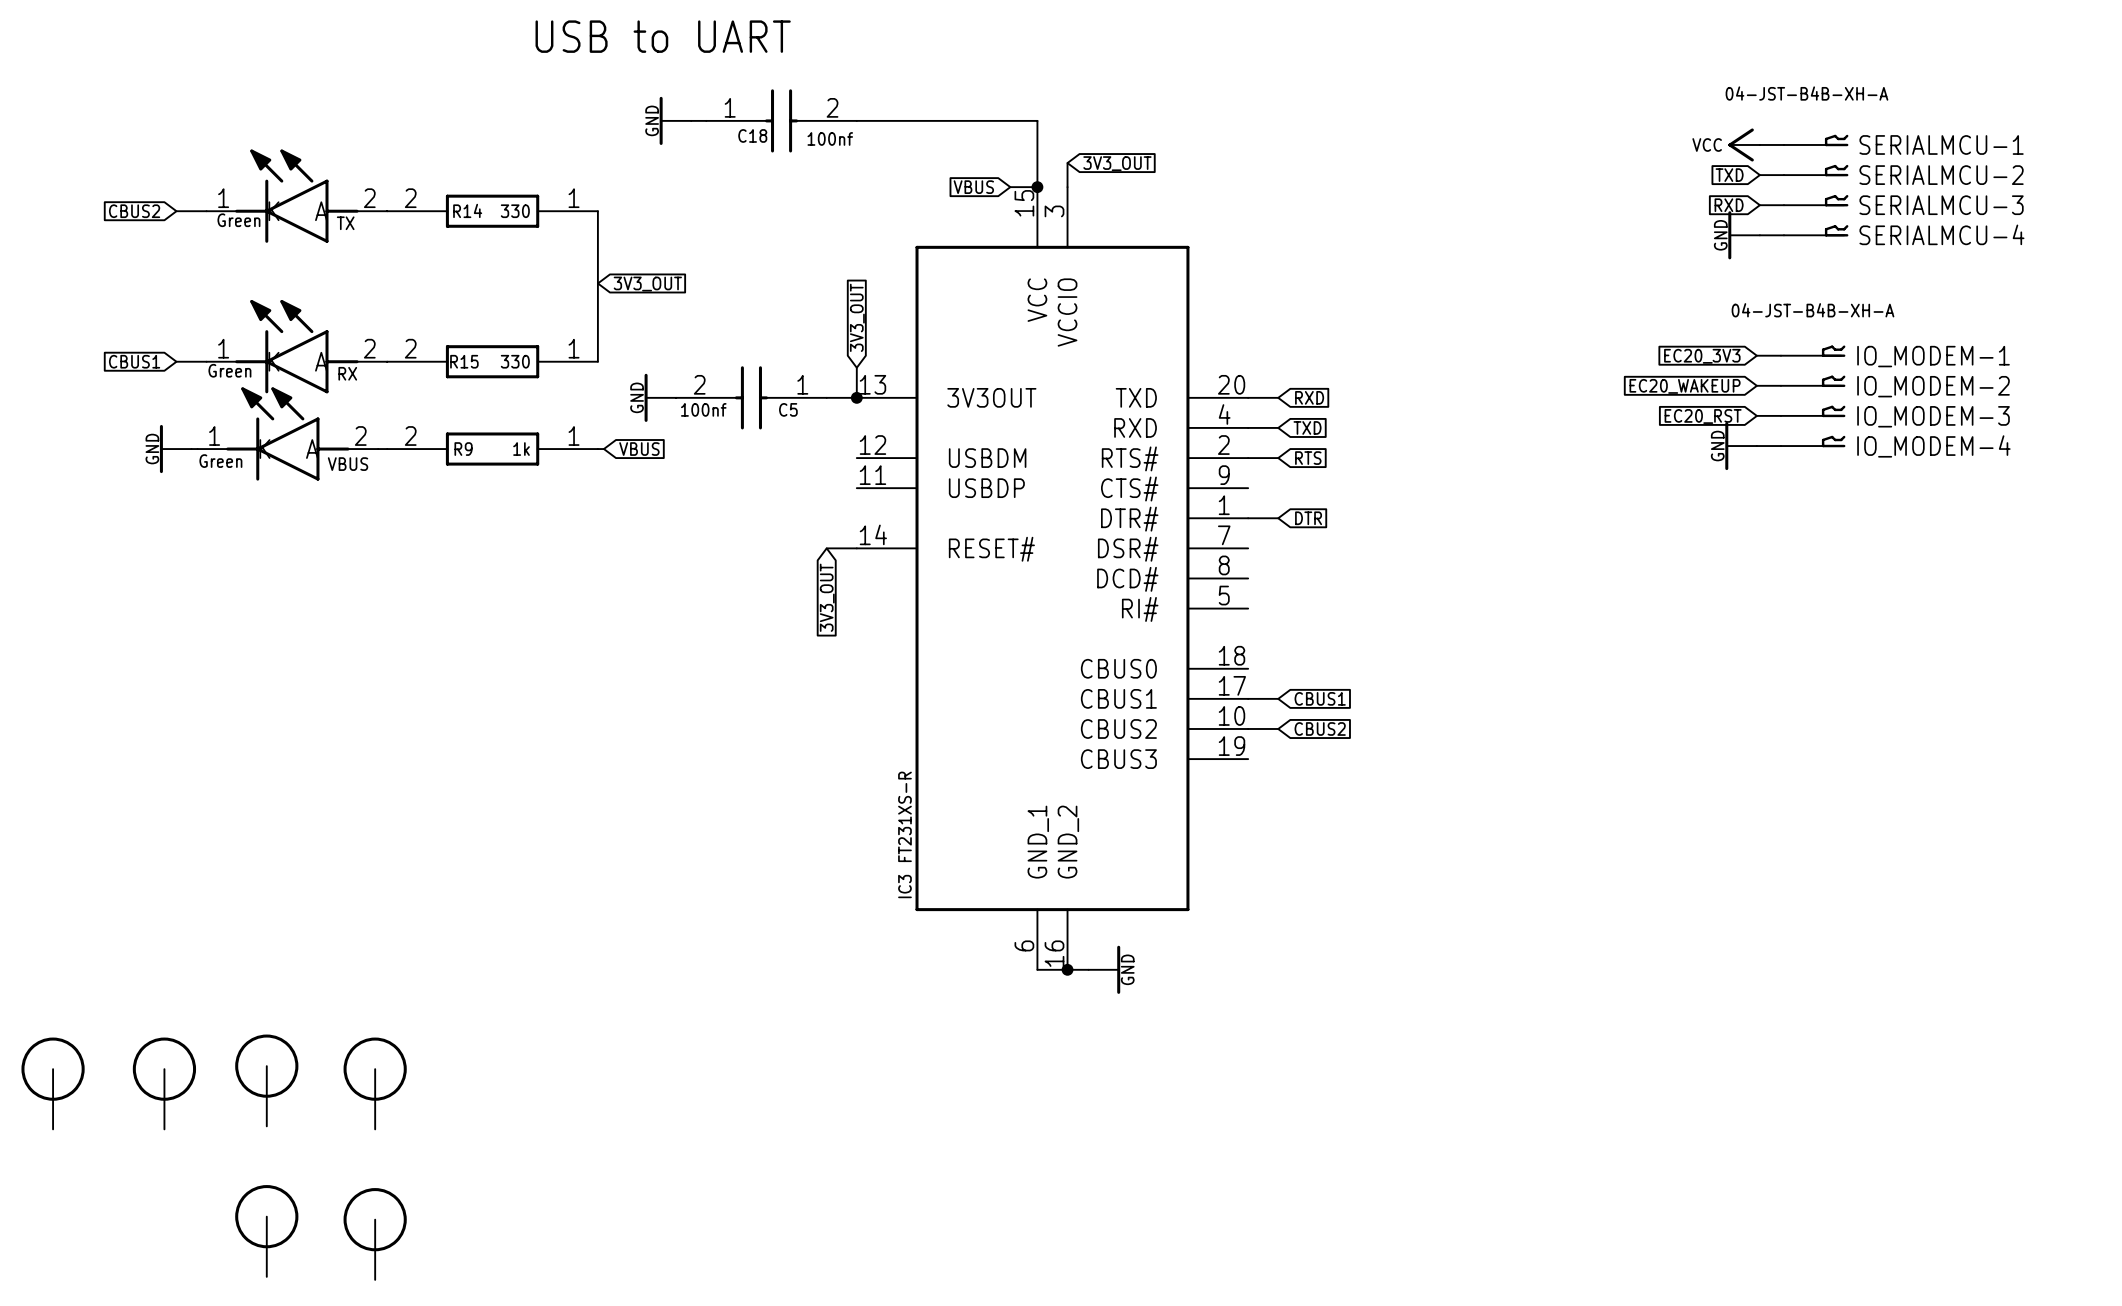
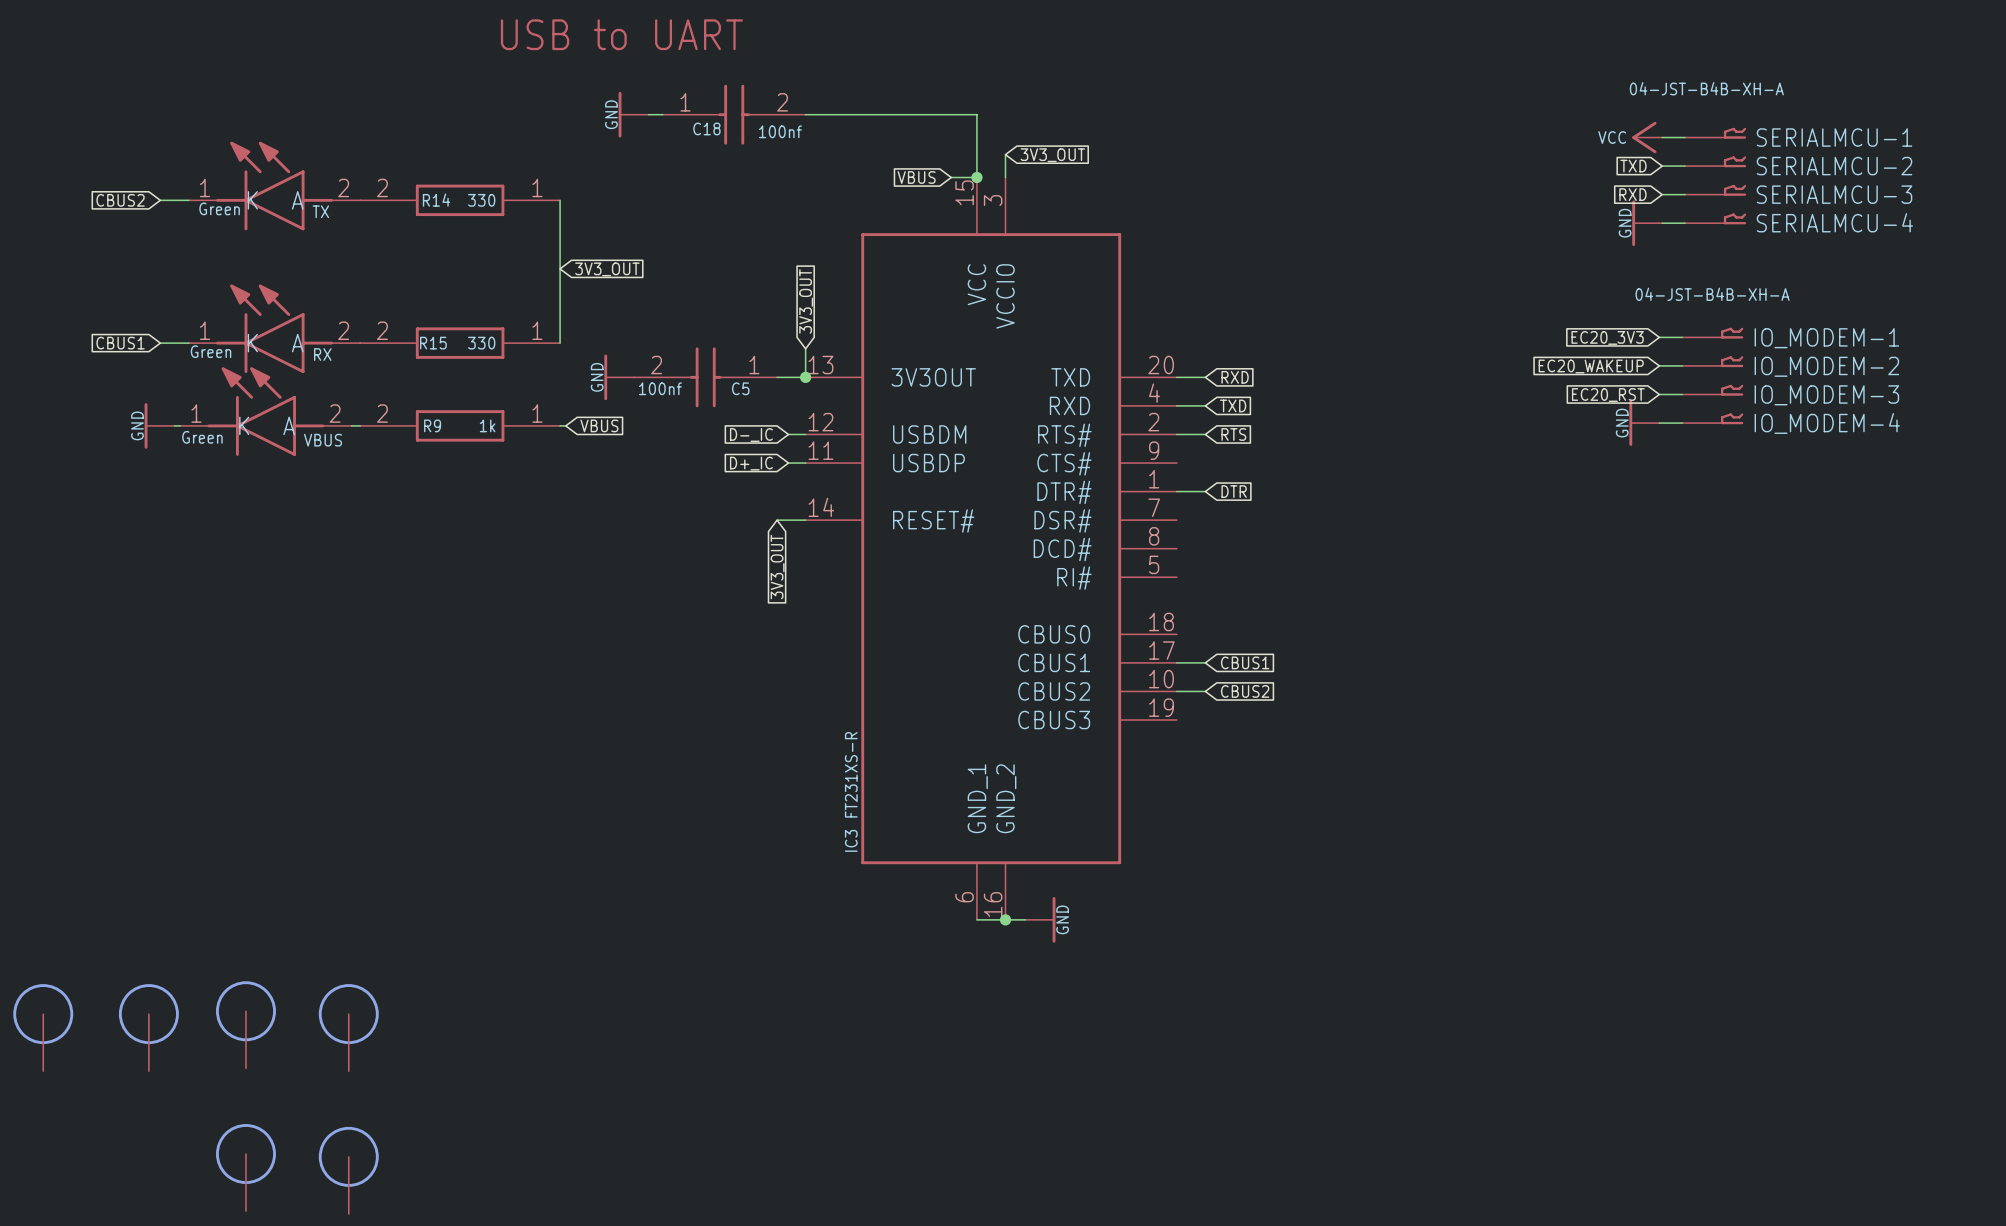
global label: none -> D-_IC (751, 435)
wire: none -> (788, 434) (805, 434)
global label: none -> D+_IC (751, 463)
wire: none -> (788, 463) (805, 463)

